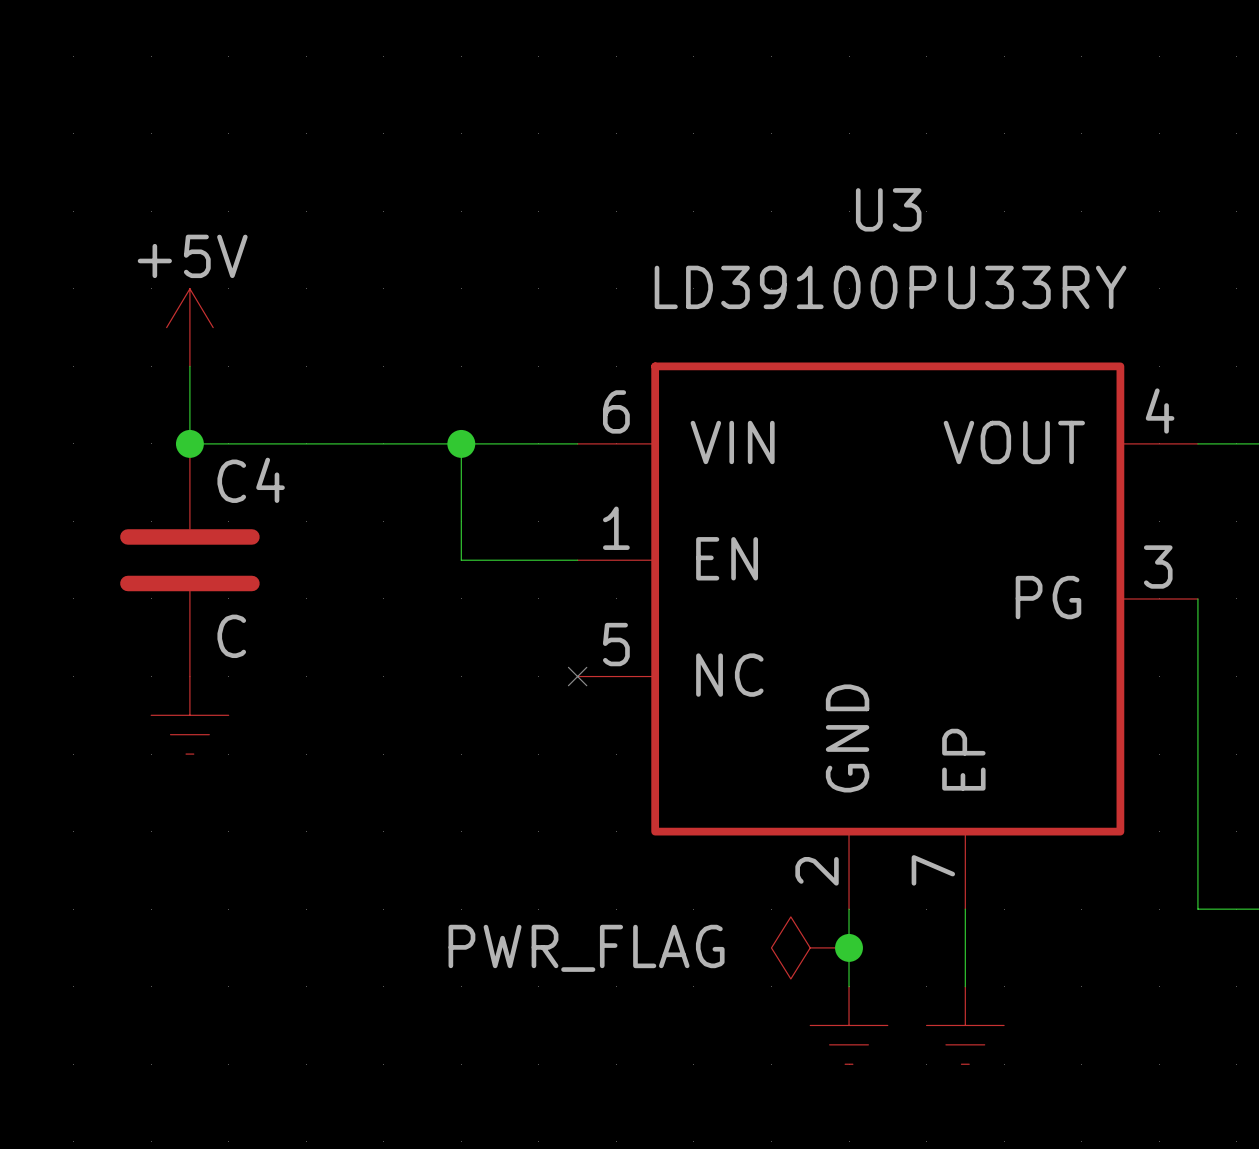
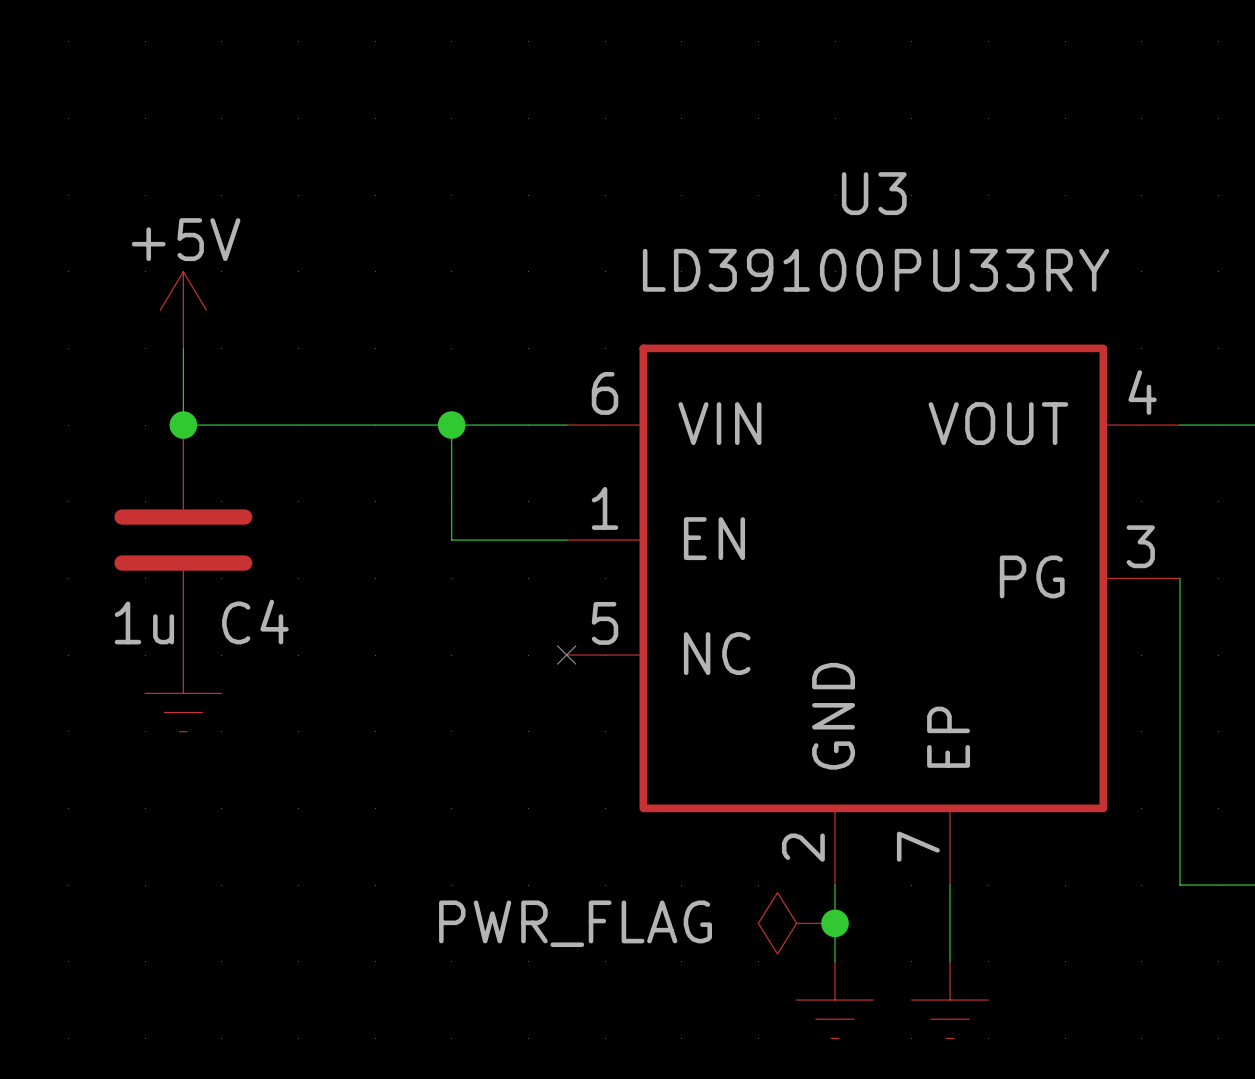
C4 name position: C4 (251, 480) -> C4 (255, 622)
C4 value: C (231, 636) -> 1u (144, 622)

